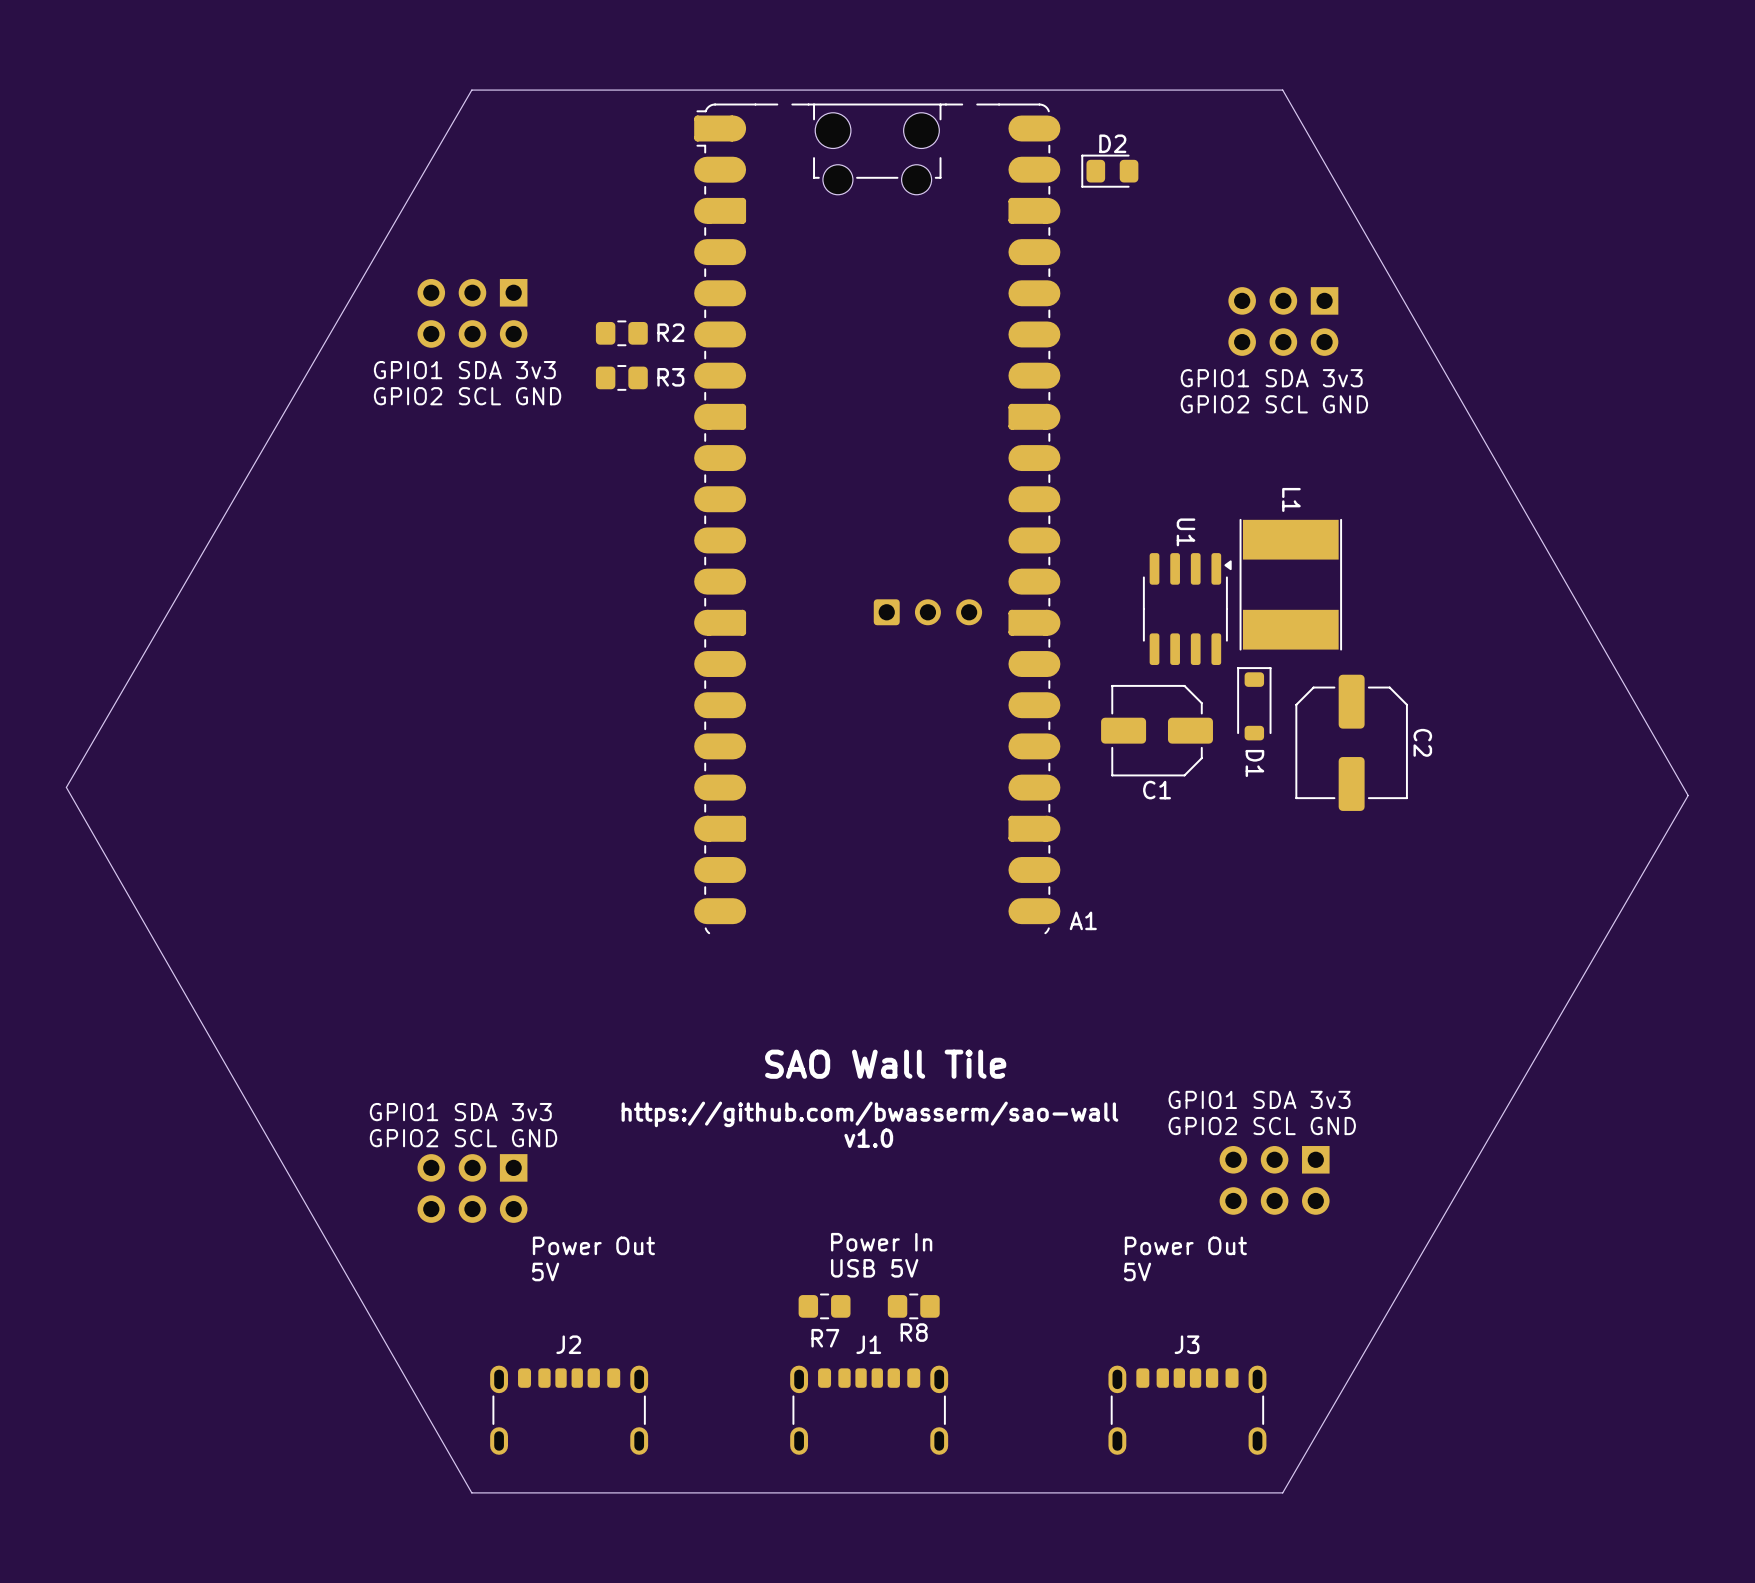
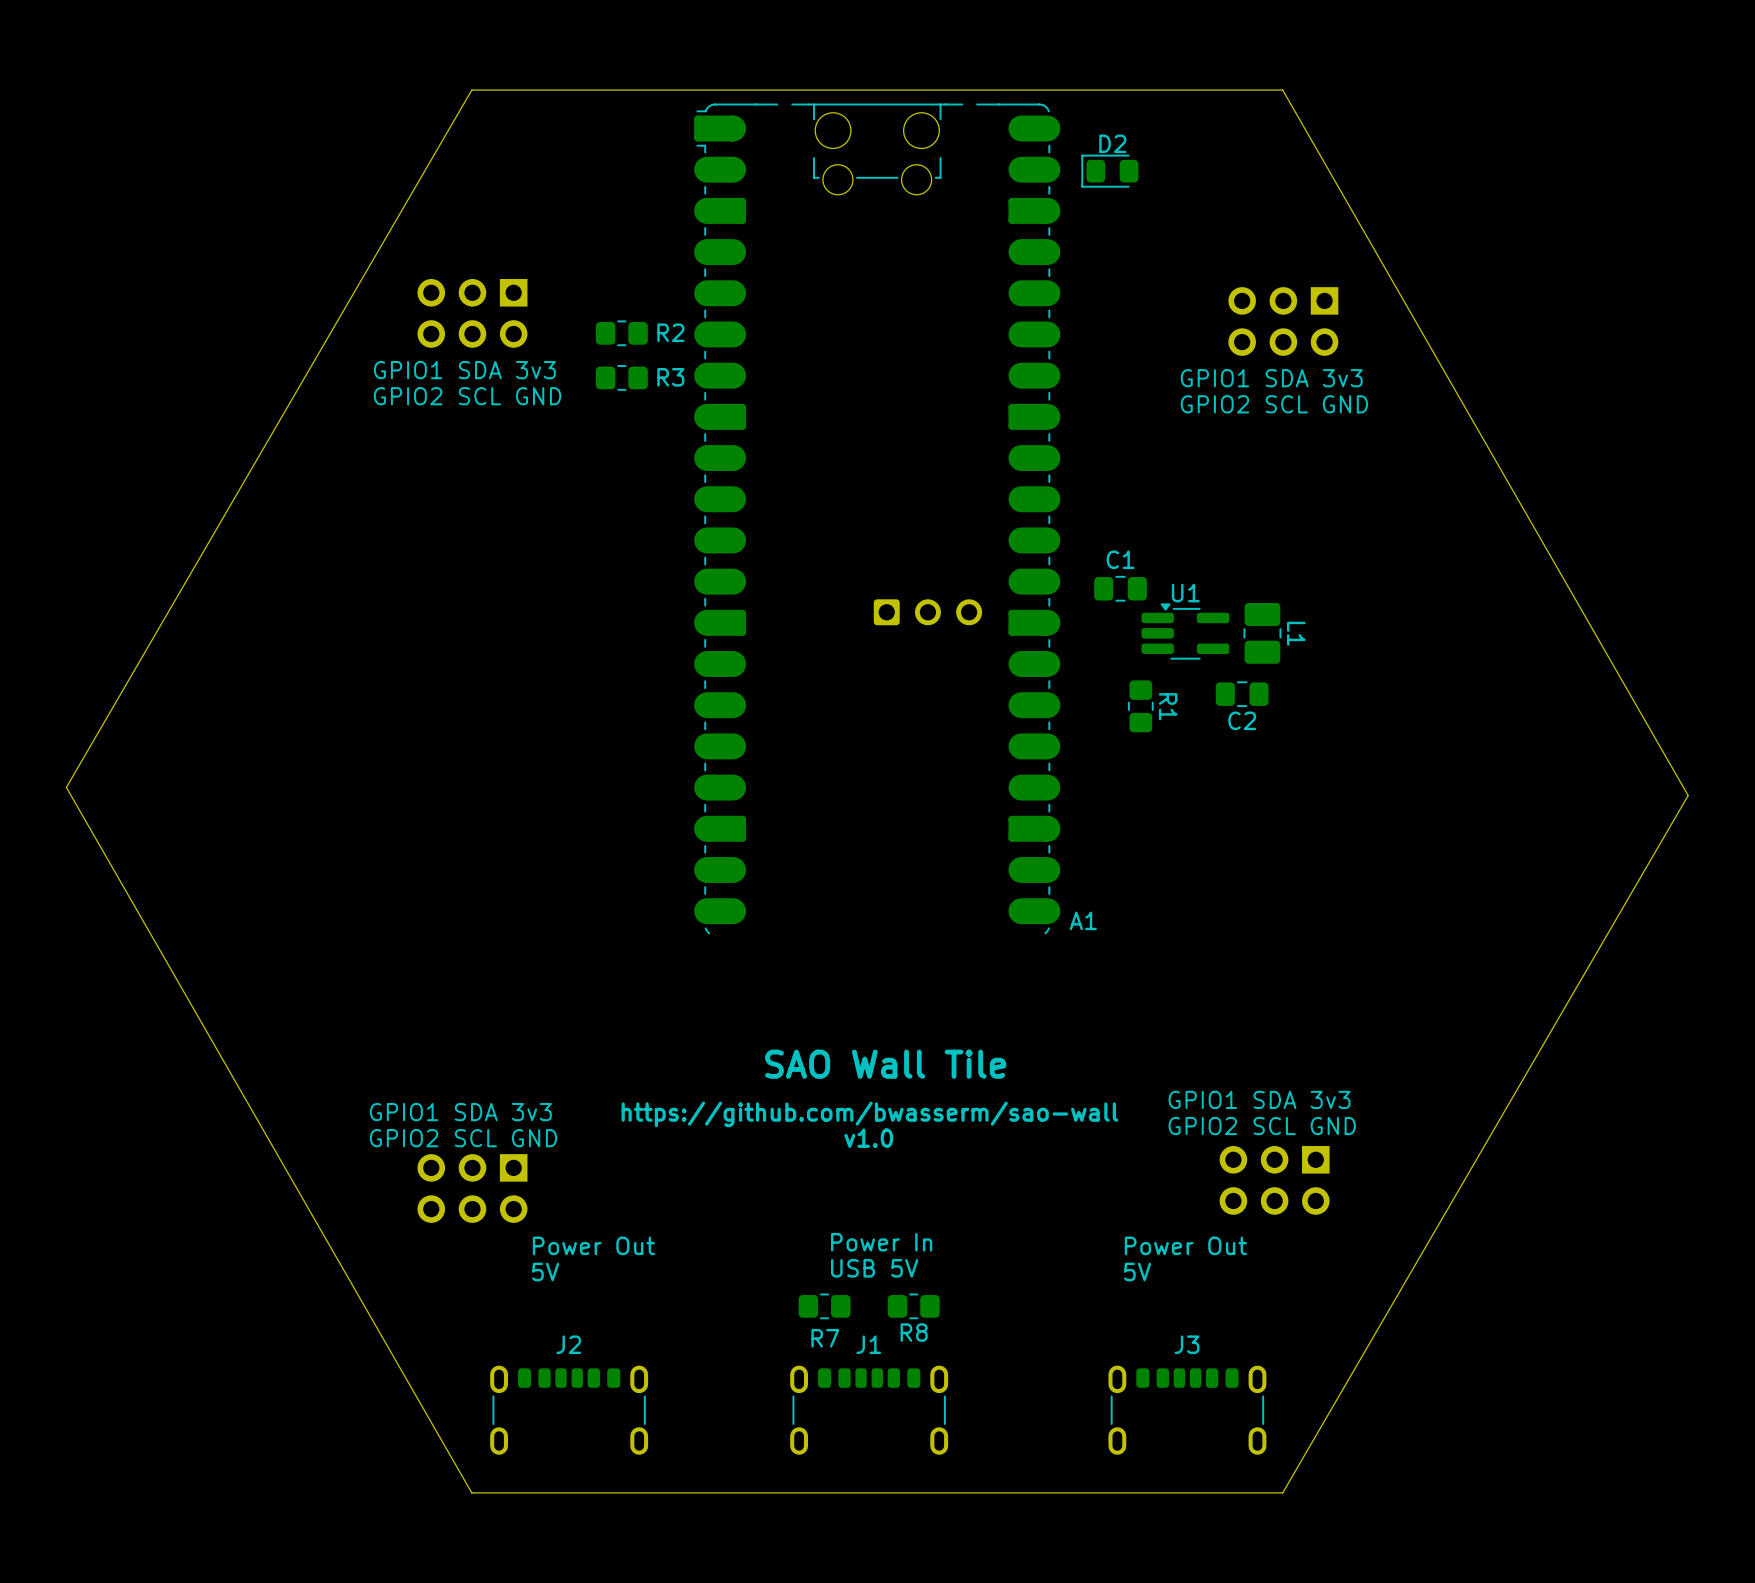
L1 name position: L1 (1291, 499) -> L1 (1296, 633)
L1 footprint: [1239, 518, 1343, 651] -> [1243, 602, 1282, 664]
U1 name position: U1 (1186, 532) -> U1 (1185, 593)
U1 footprint: [1142, 553, 1232, 665] -> [1141, 603, 1230, 660]
C2 footprint: [1295, 674, 1408, 811] -> [1215, 681, 1269, 708]
C1 footprint: [1101, 684, 1213, 777] -> [1094, 575, 1147, 602]
D1: (1254, 703) -> none
R1: none -> (1140, 706)
C2 name position: C2 (1422, 742) -> C2 (1242, 720)
C1 name position: C1 (1157, 790) -> C1 (1120, 559)

